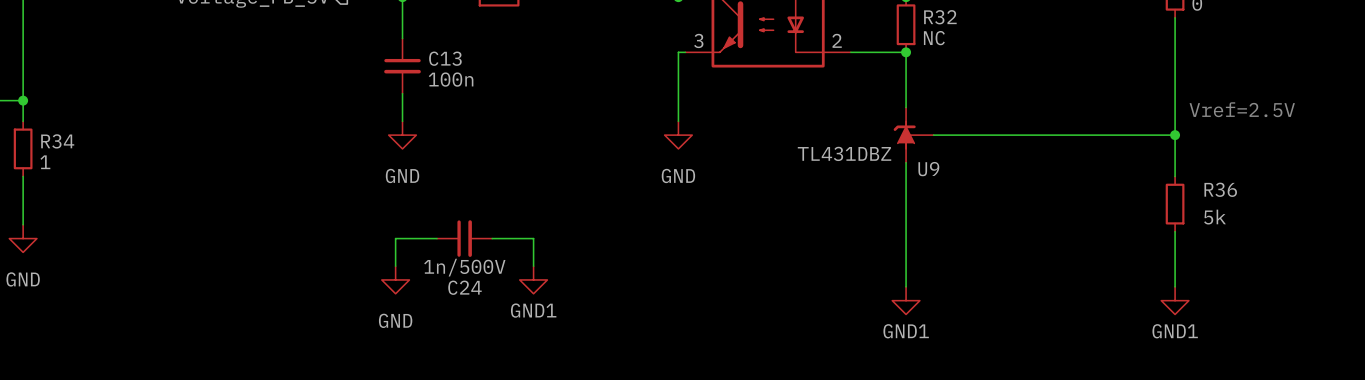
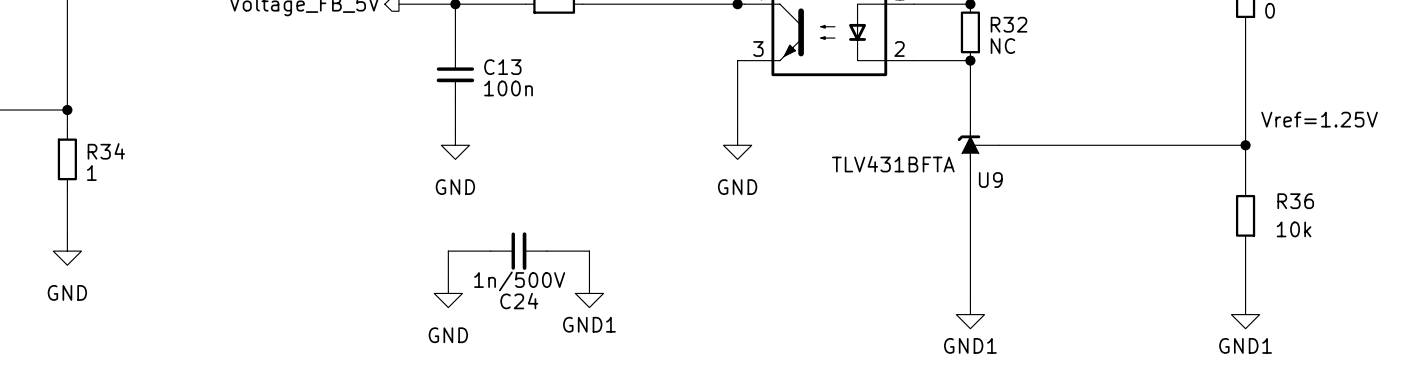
text: Vref=2.5V (1242, 109) -> Vref=1.25V (1319, 119)
U9 value: TL431DBZ (844, 153) -> TLV431BFTA (893, 164)
R36 value: 5k (1214, 217) -> 10k (1294, 229)

